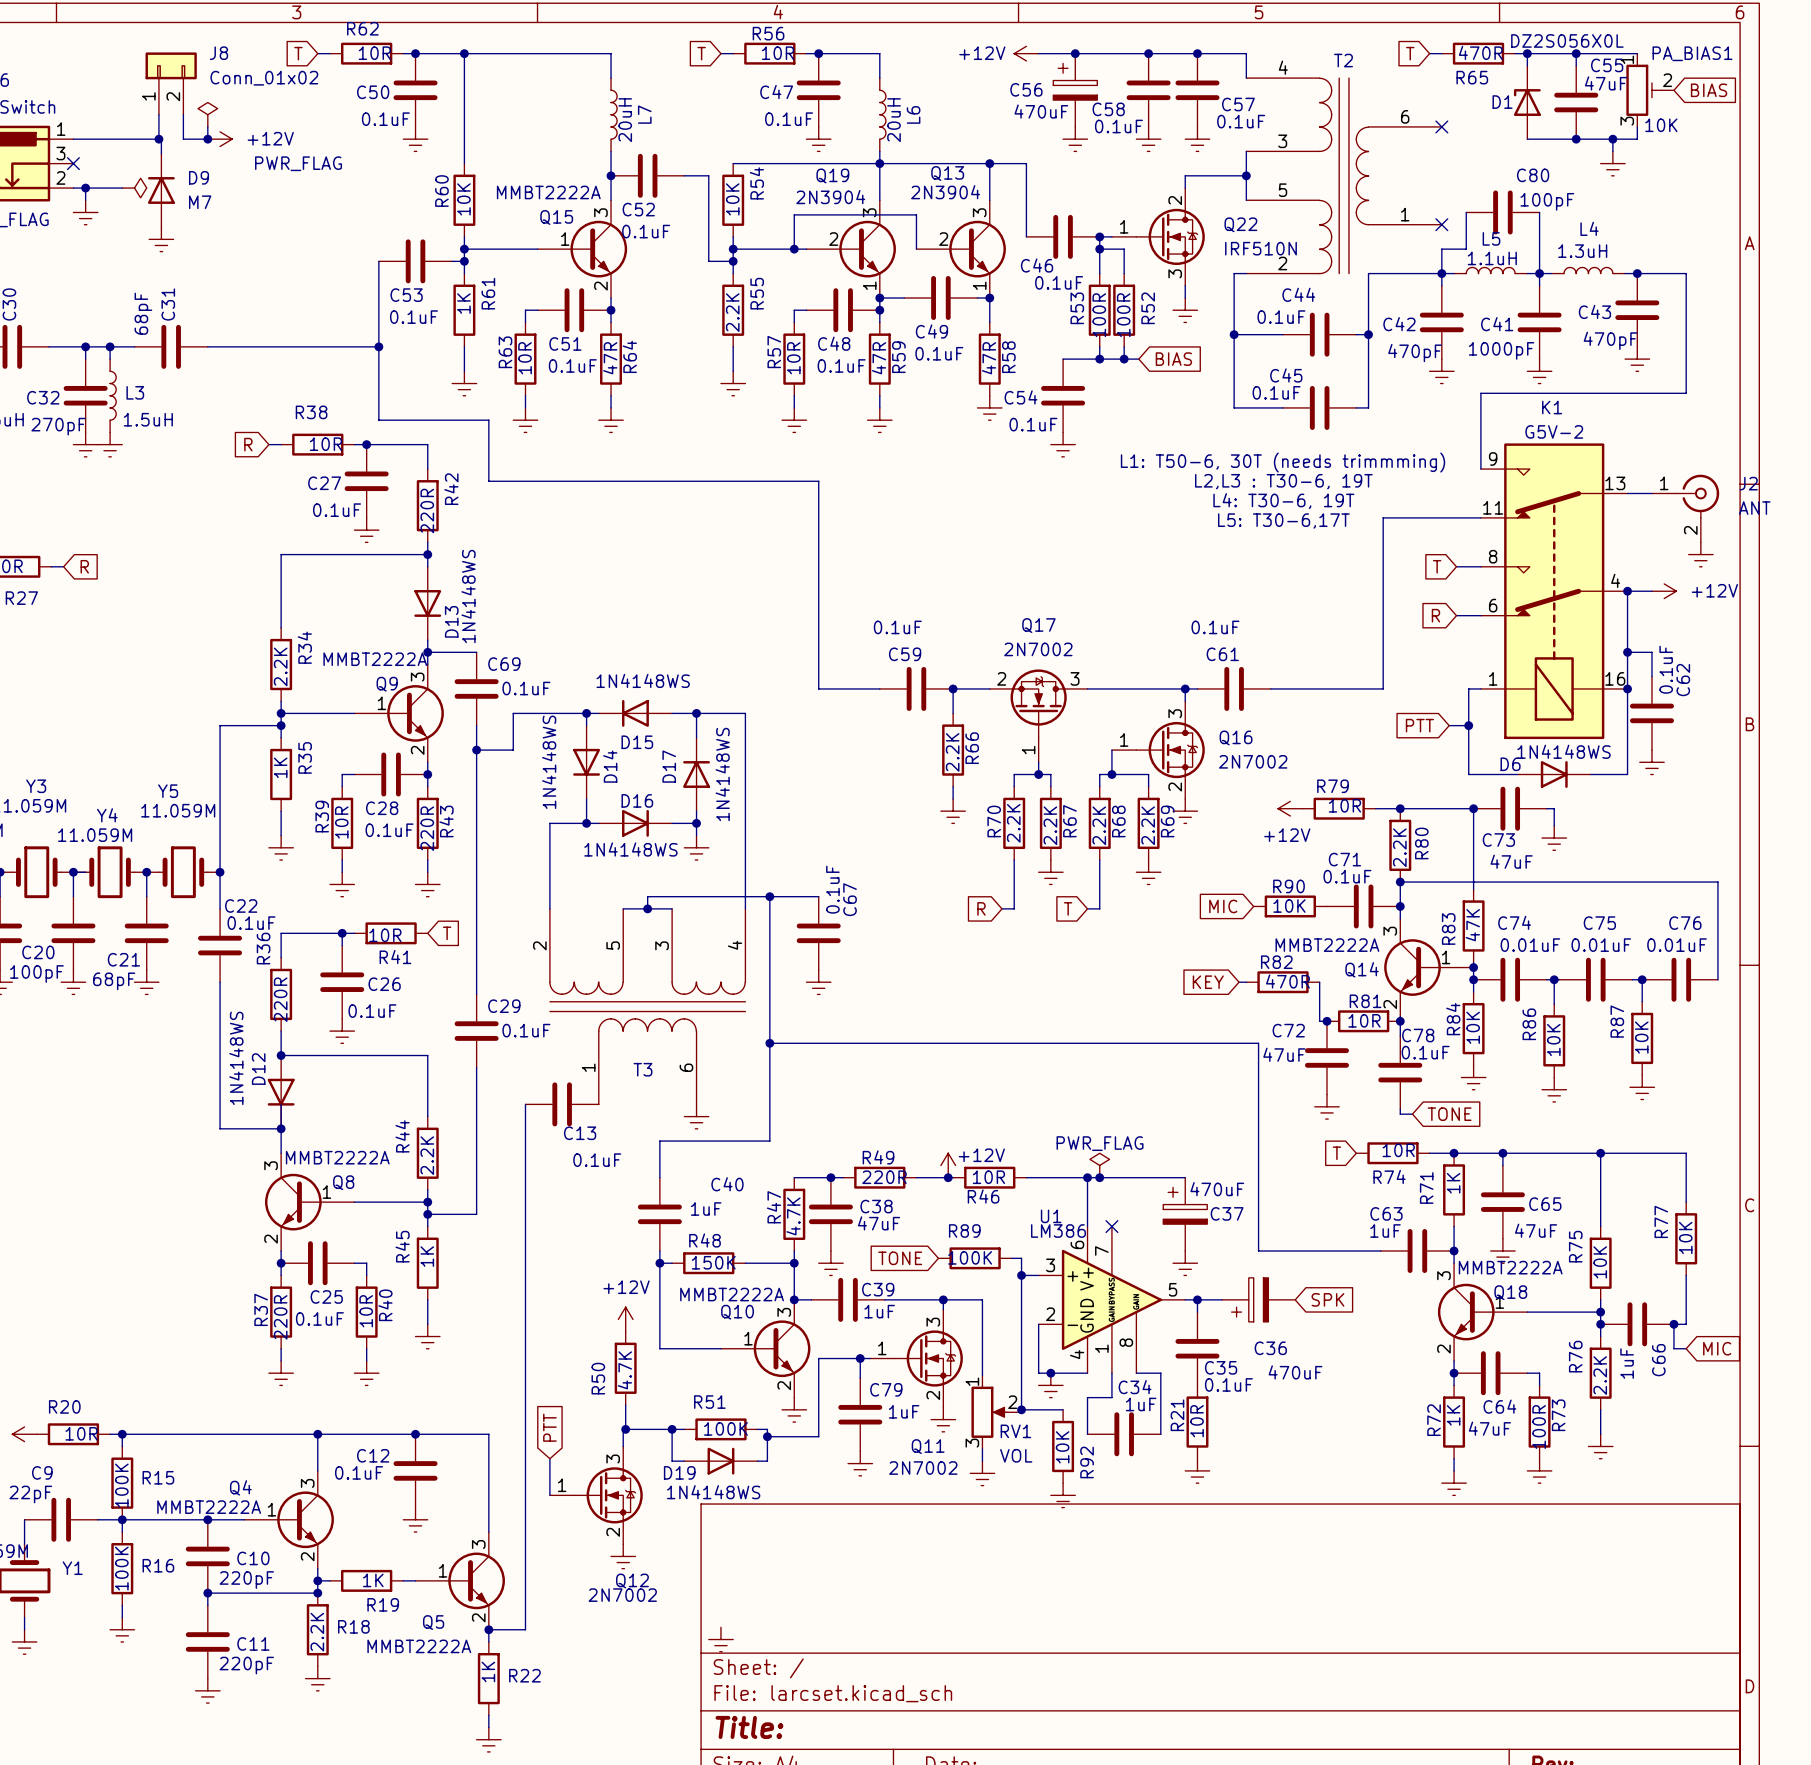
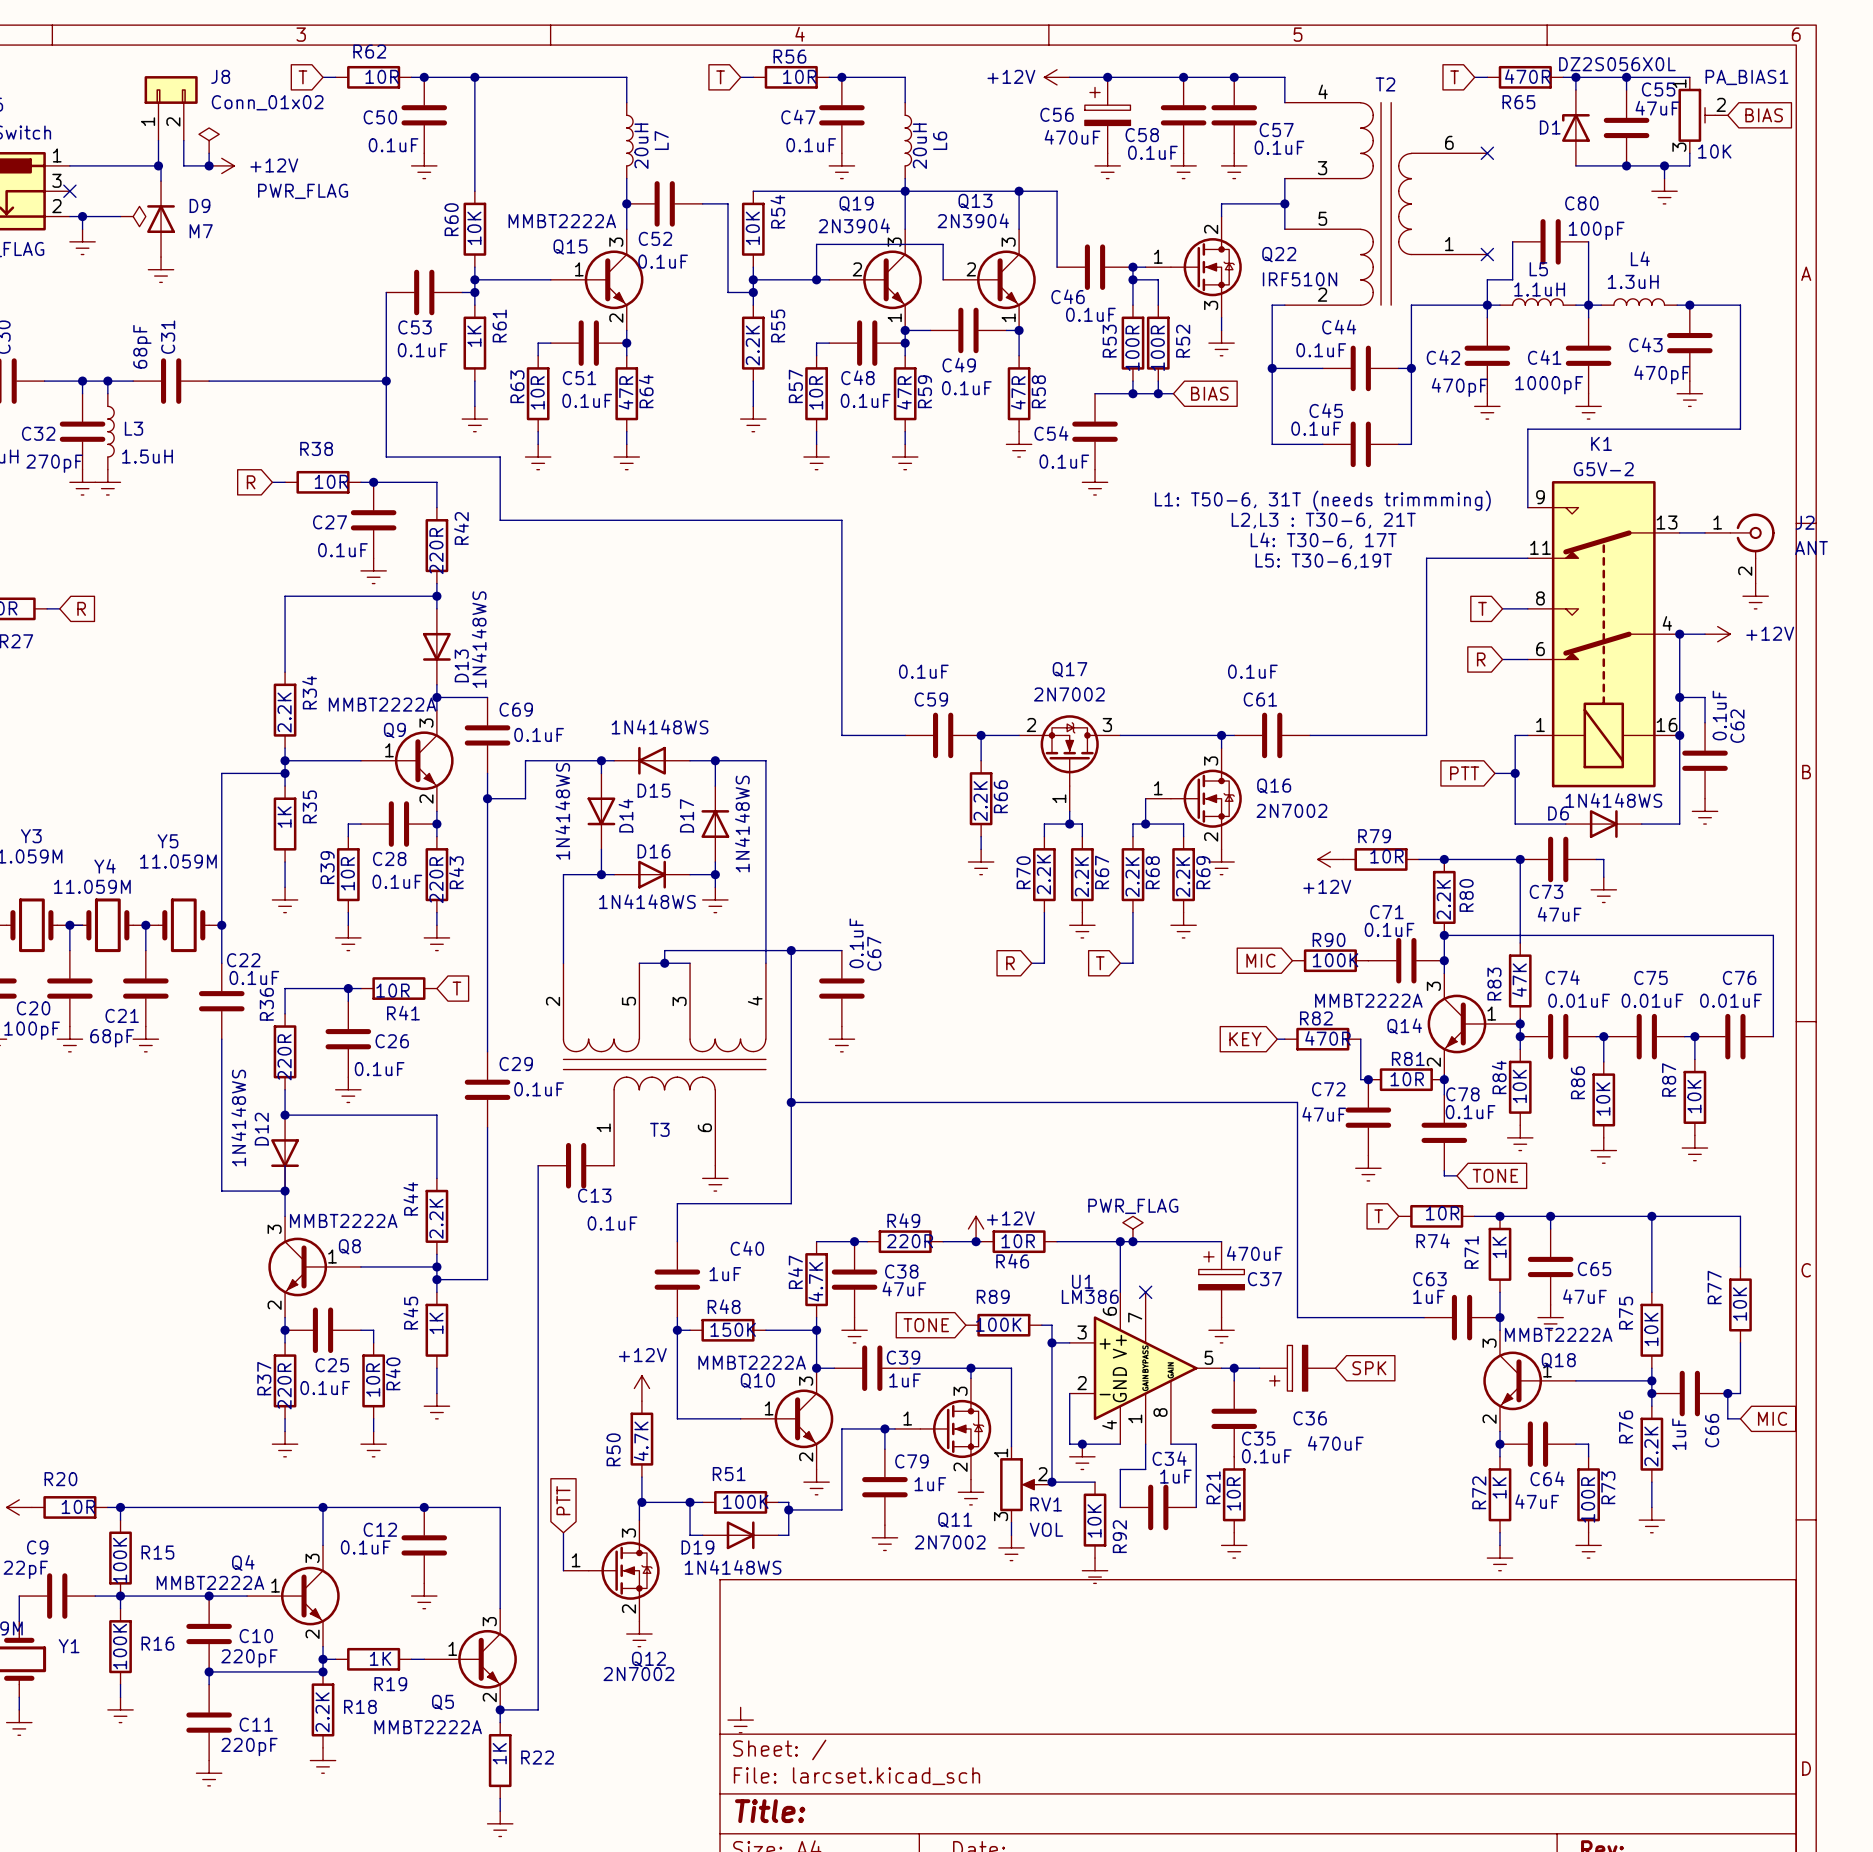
text: L1: T50-6, 30T (needs trimmming) (1283, 462) -> L1: T50-6, 31T (needs trimmming) (1322, 500)
text: L2,L3 : T30-6, 19T (1283, 481) -> L2,L3 : T30-6, 21T (1323, 520)
text: L4: T30-6, 19T (1283, 501) -> L4: T30-6, 17T (1323, 540)
text: L5: T30-6,17T (1283, 521) -> L5: T30-6,19T (1323, 561)
R90 value: 10K (1289, 906) -> 100K (1335, 960)

